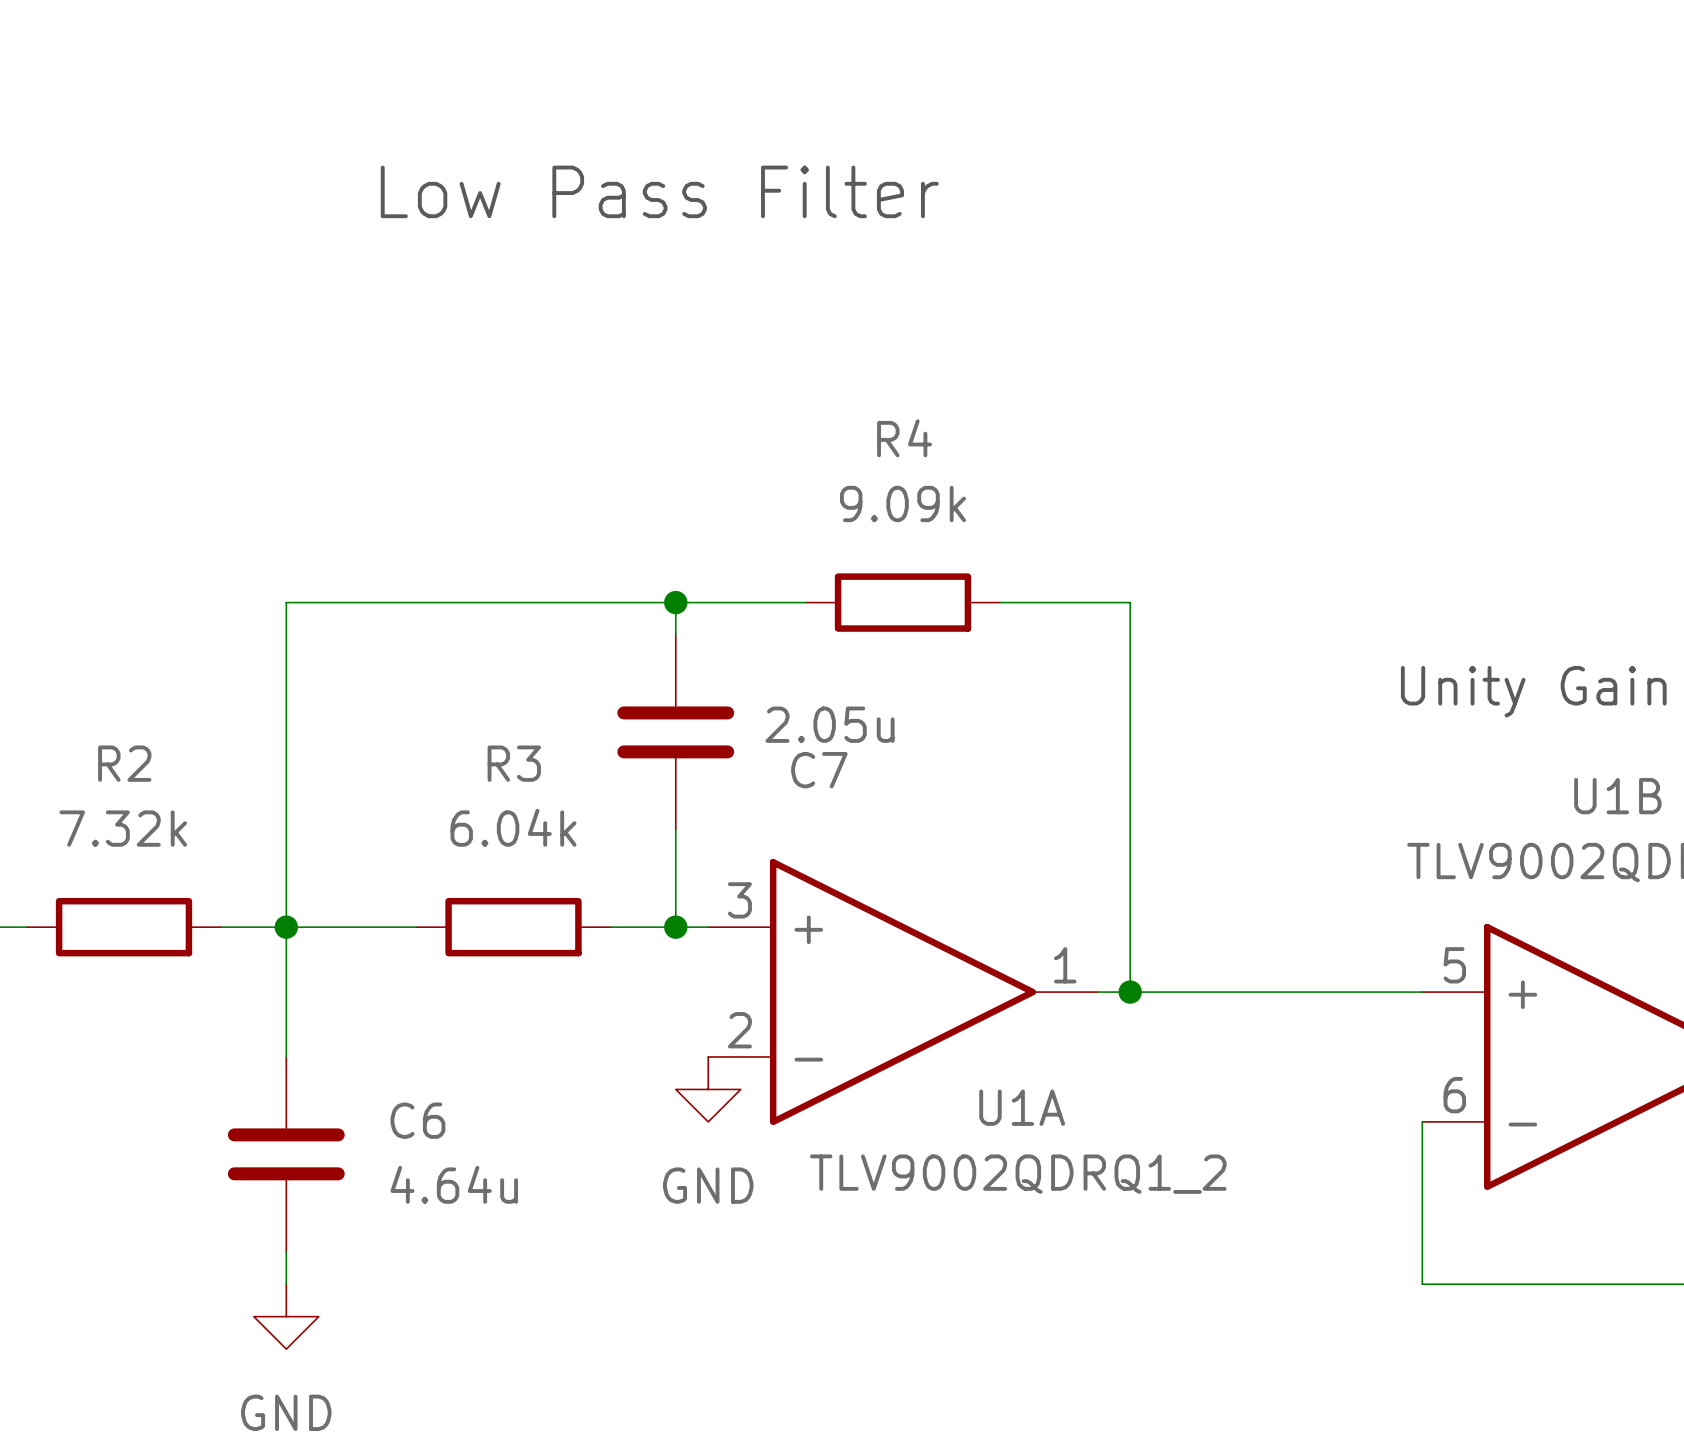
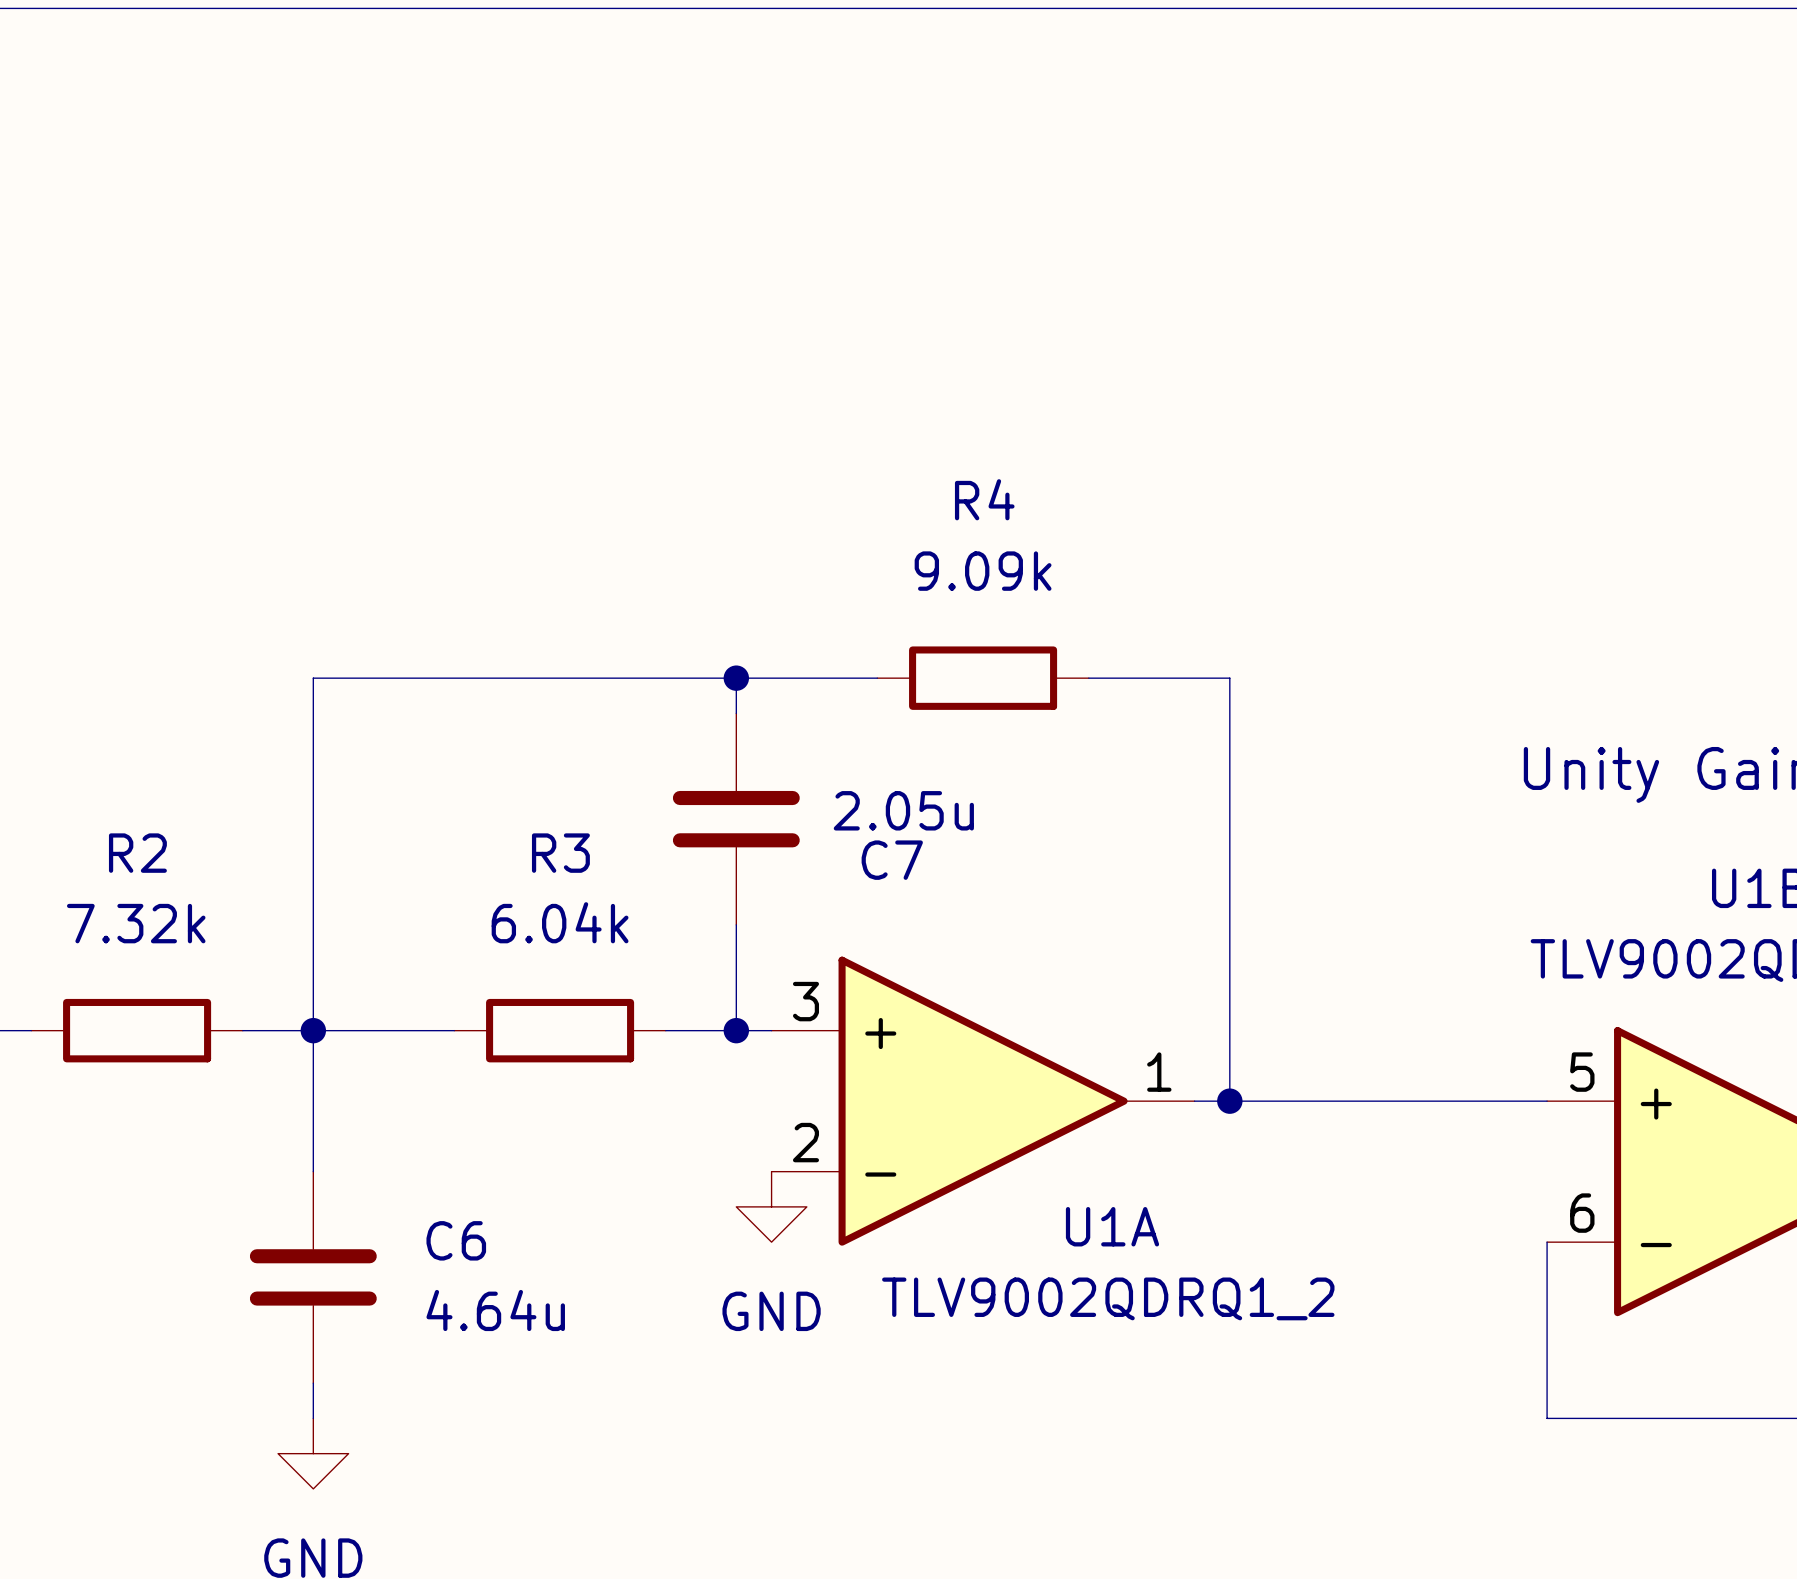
text: Low Pass Filter (659, 191) -> none

